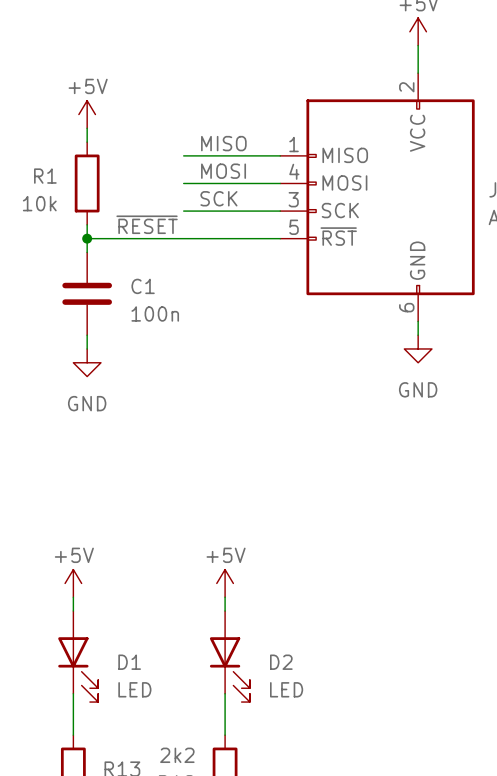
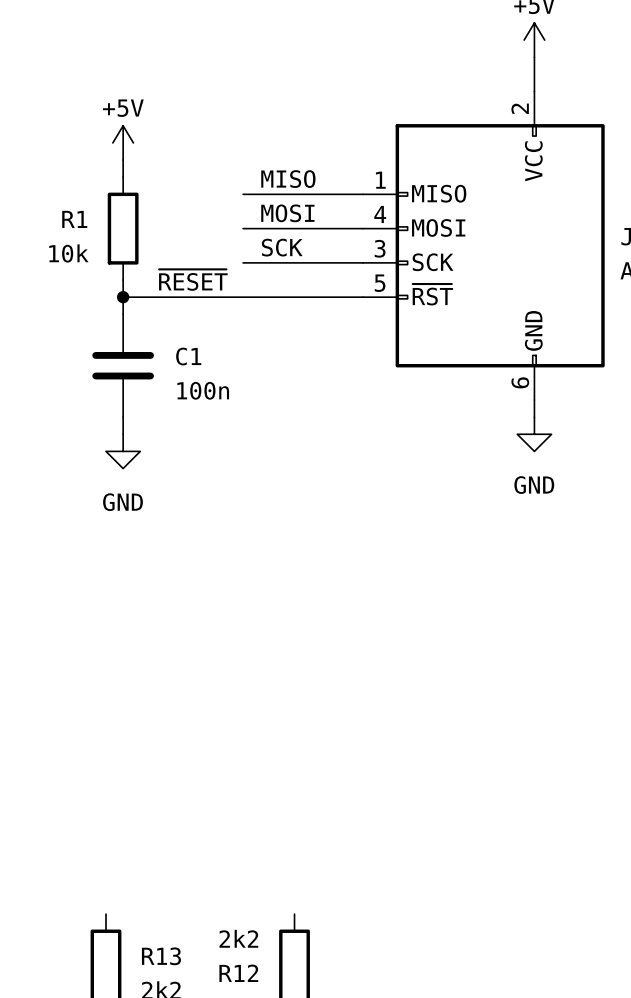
power symbol: +5V (73, 583) -> none
power symbol: +5V (225, 583) -> none
wire: (73, 597) (73, 611) -> none
wire: (225, 597) (225, 611) -> none
D1: LED (78, 656) -> none
D2: LED (229, 656) -> none
wire: (73, 693) (73, 735) -> none
wire: (225, 693) (225, 735) -> none

